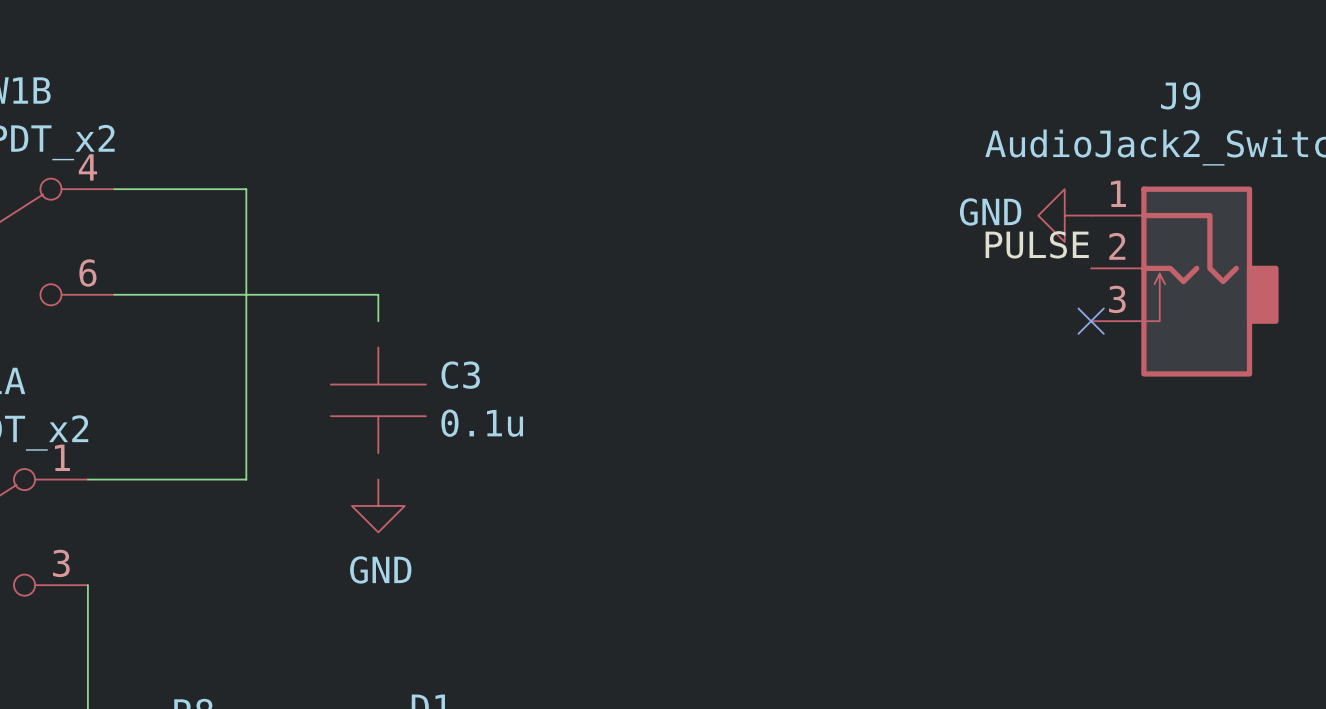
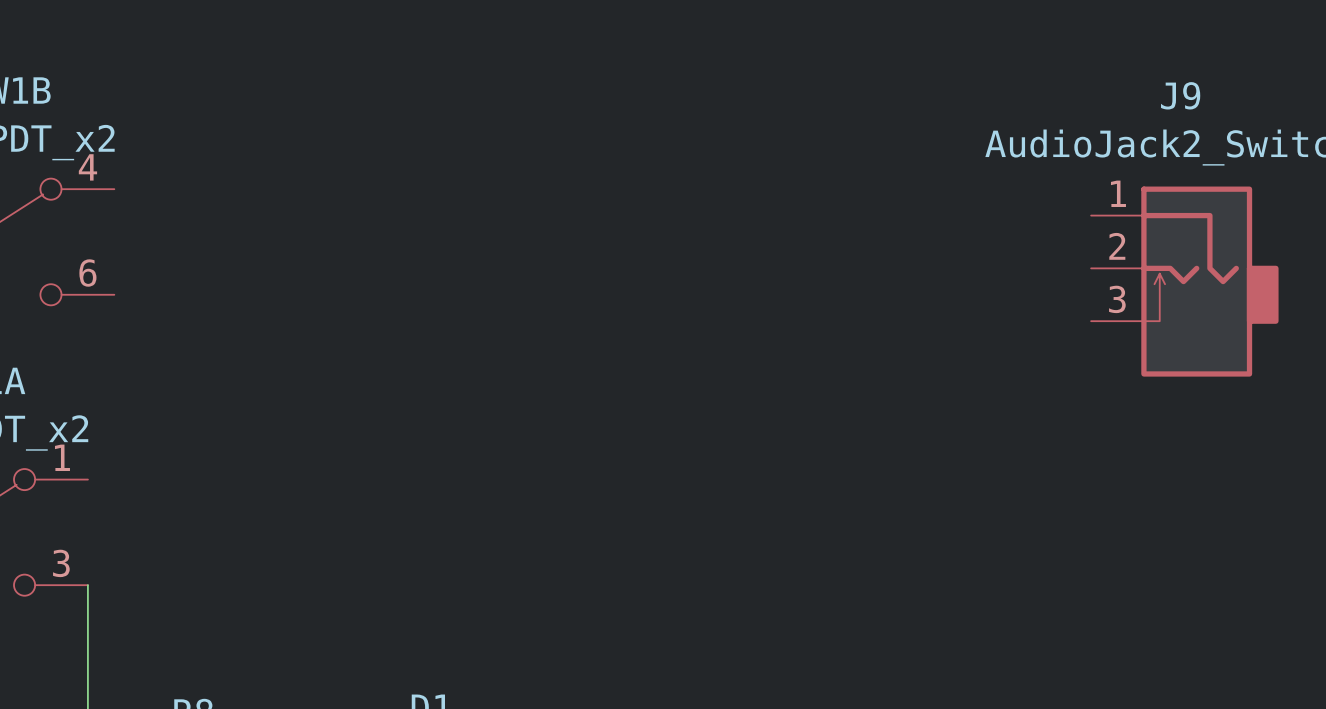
wire: (114, 189) (246, 189) (246, 479) (87, 479) -> none
power symbol: GND (1064, 215) -> none
label: PULSE (1037, 244) -> none
wire: (114, 294) (378, 294) (378, 321) -> none
no-connect mark: (1091, 321) -> none
C3: 0.1u (378, 400) -> none
power symbol: GND (378, 505) -> none

